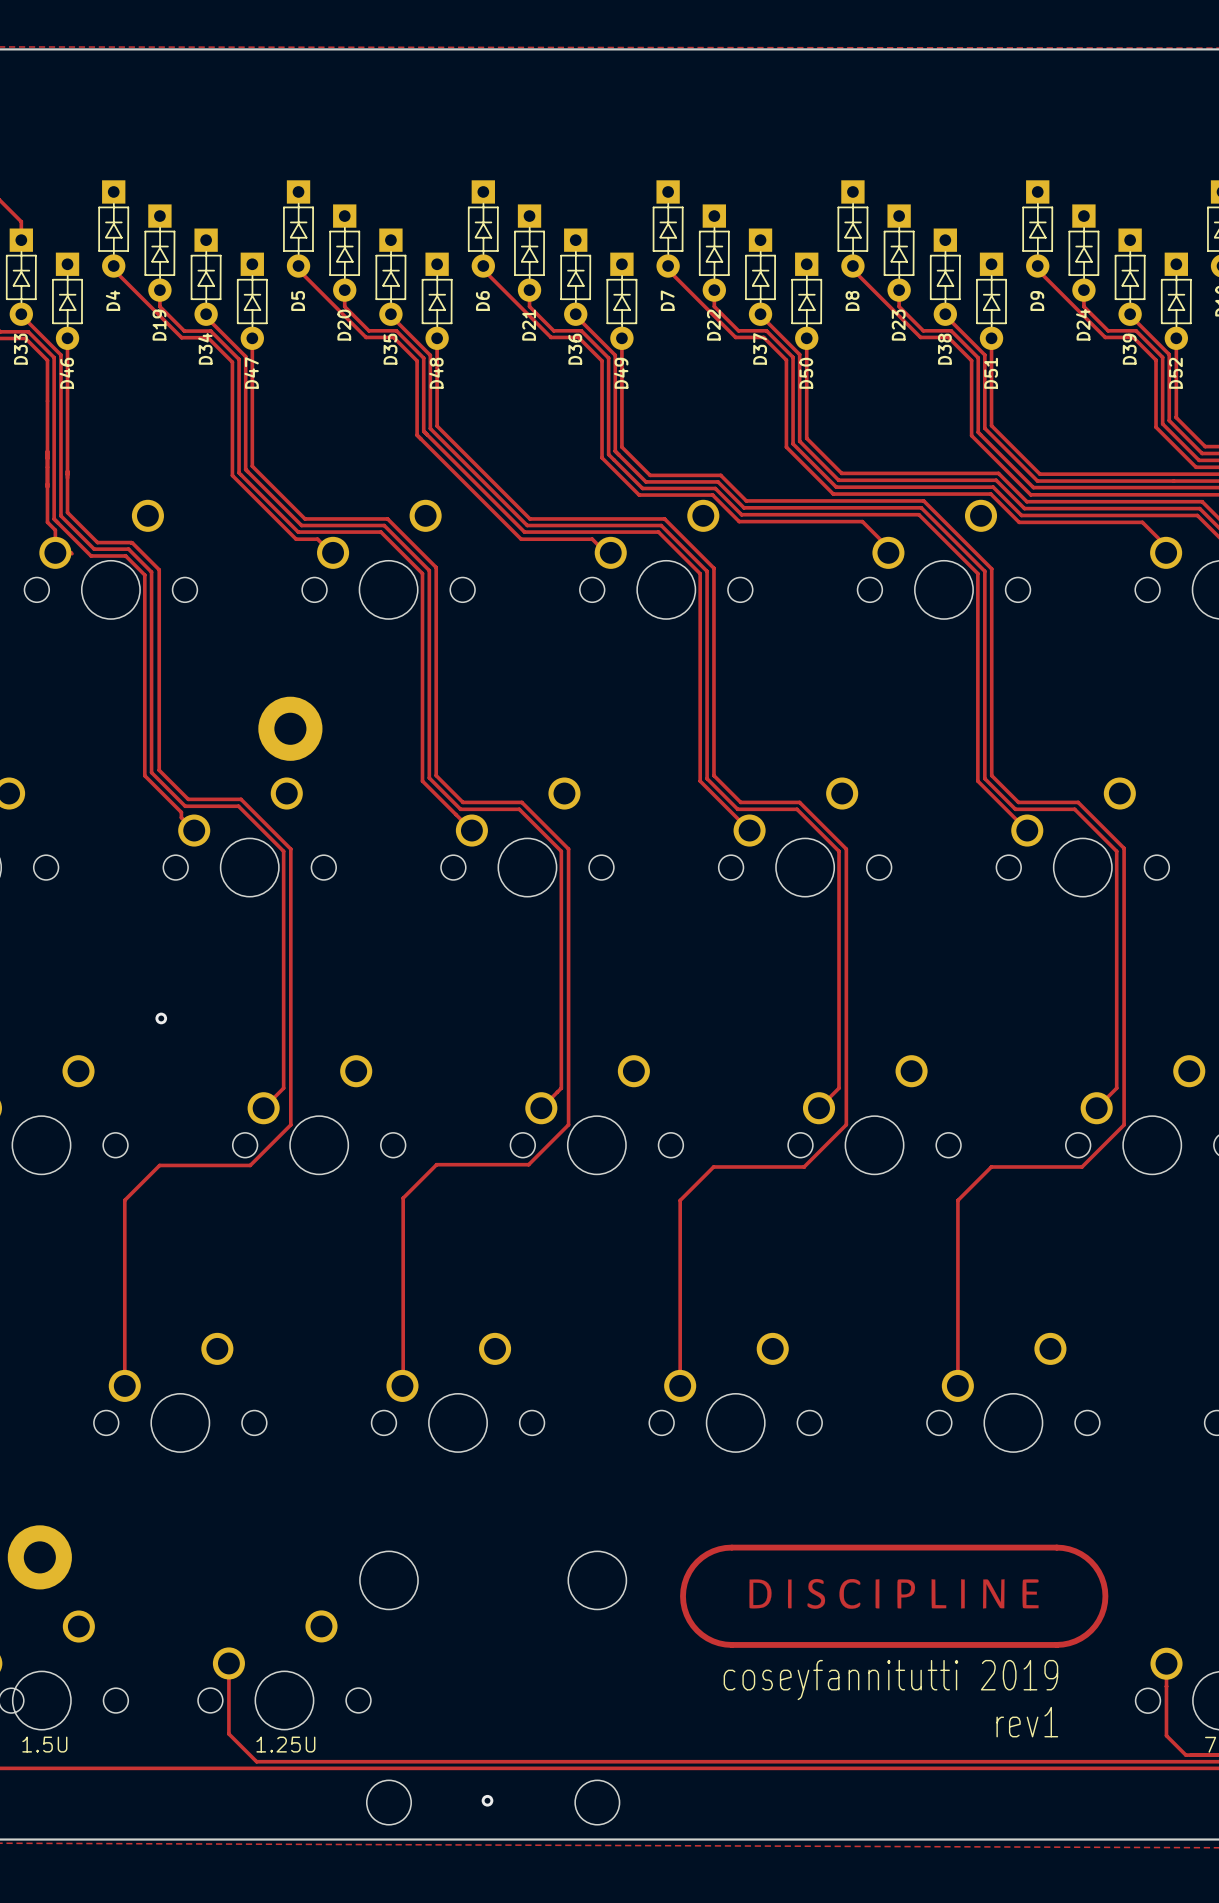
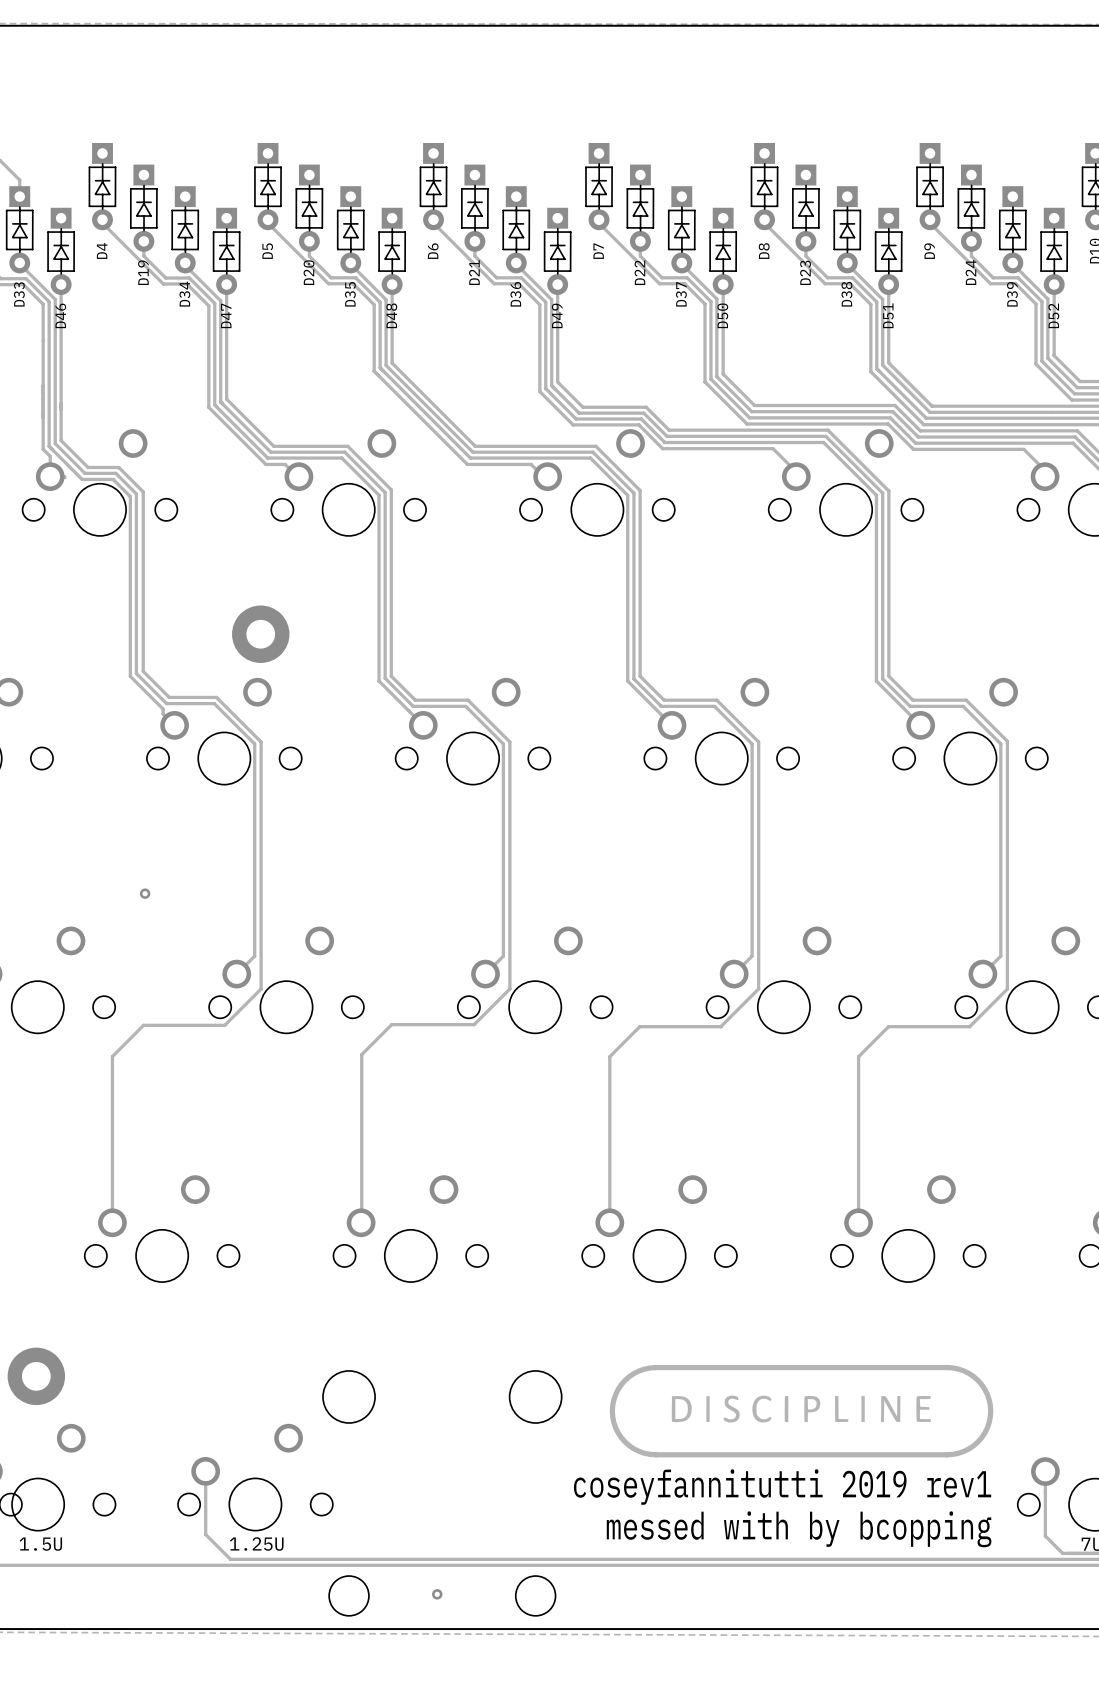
text: coseyfannitutti 2019 (890, 1680) -> coseyfannitutti 2019 rev1 (782, 1487)
text: rev1 (1027, 1722) -> none
text: none -> messed with by bcopping (799, 1529)

